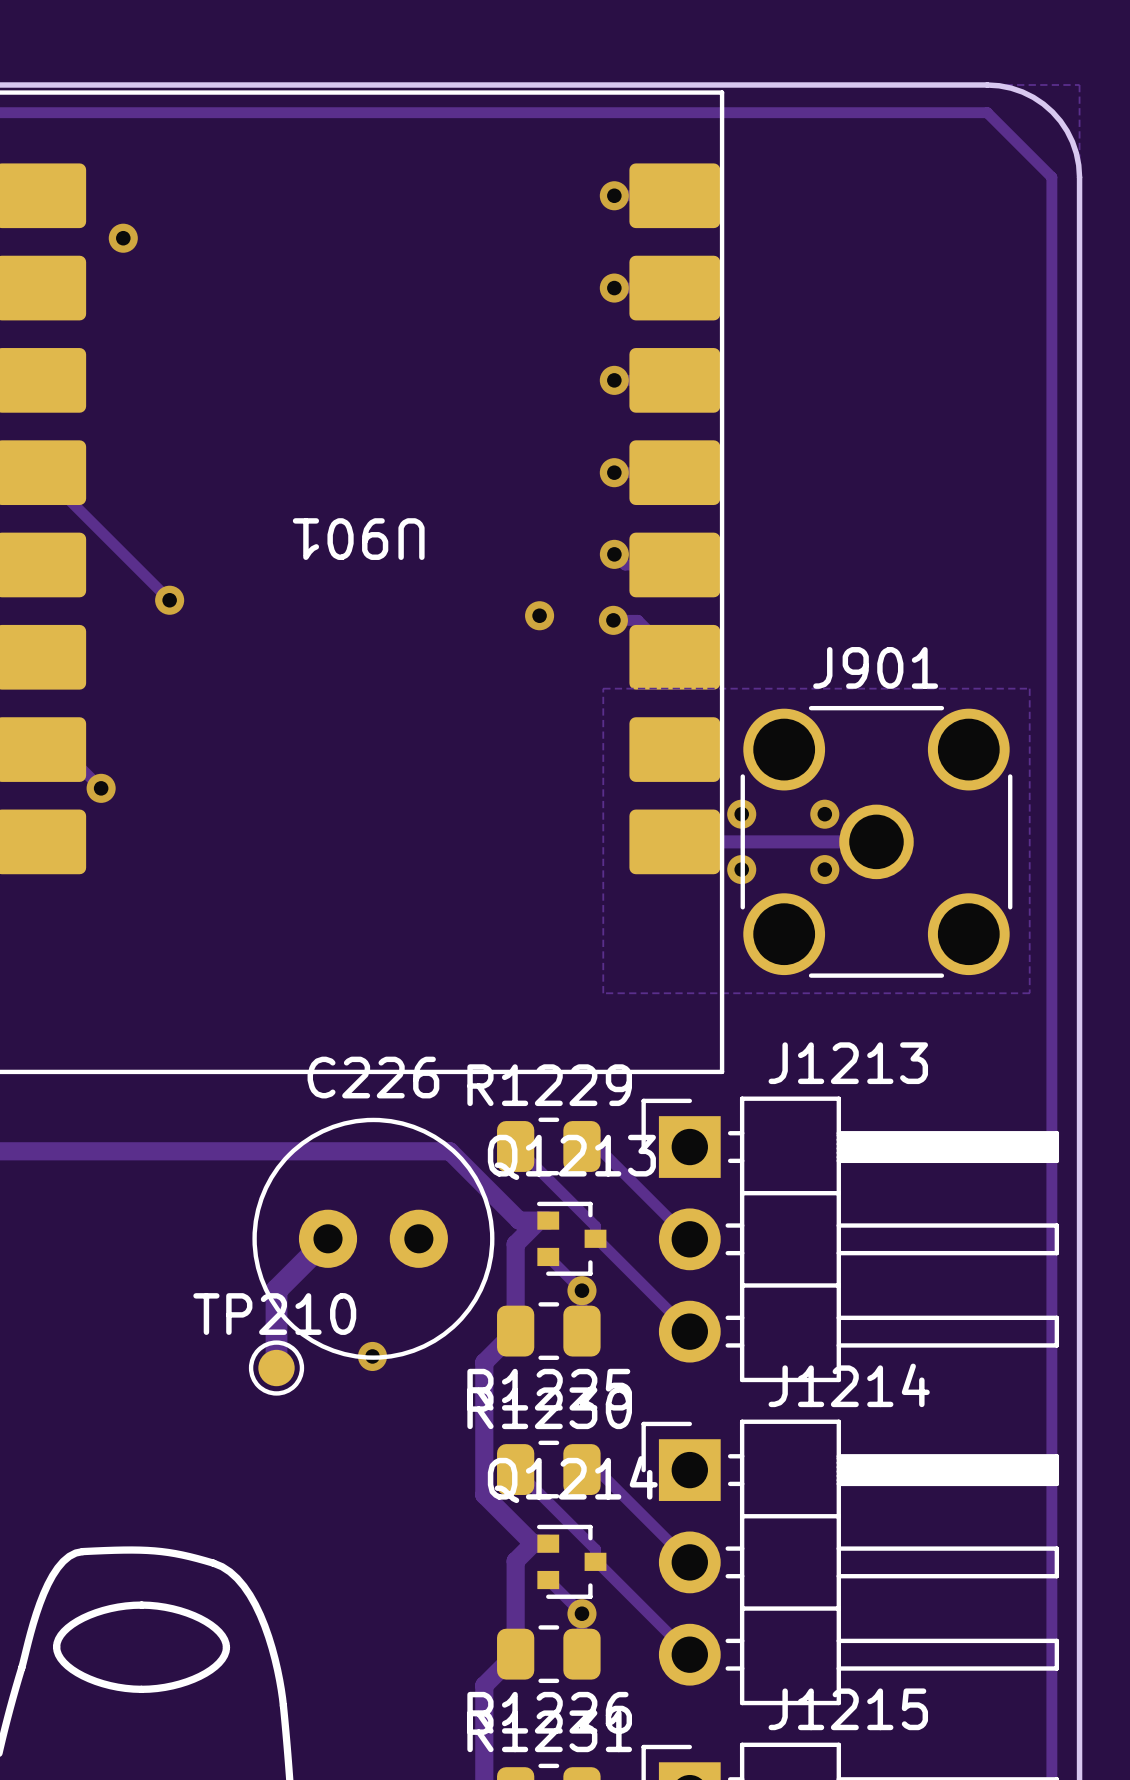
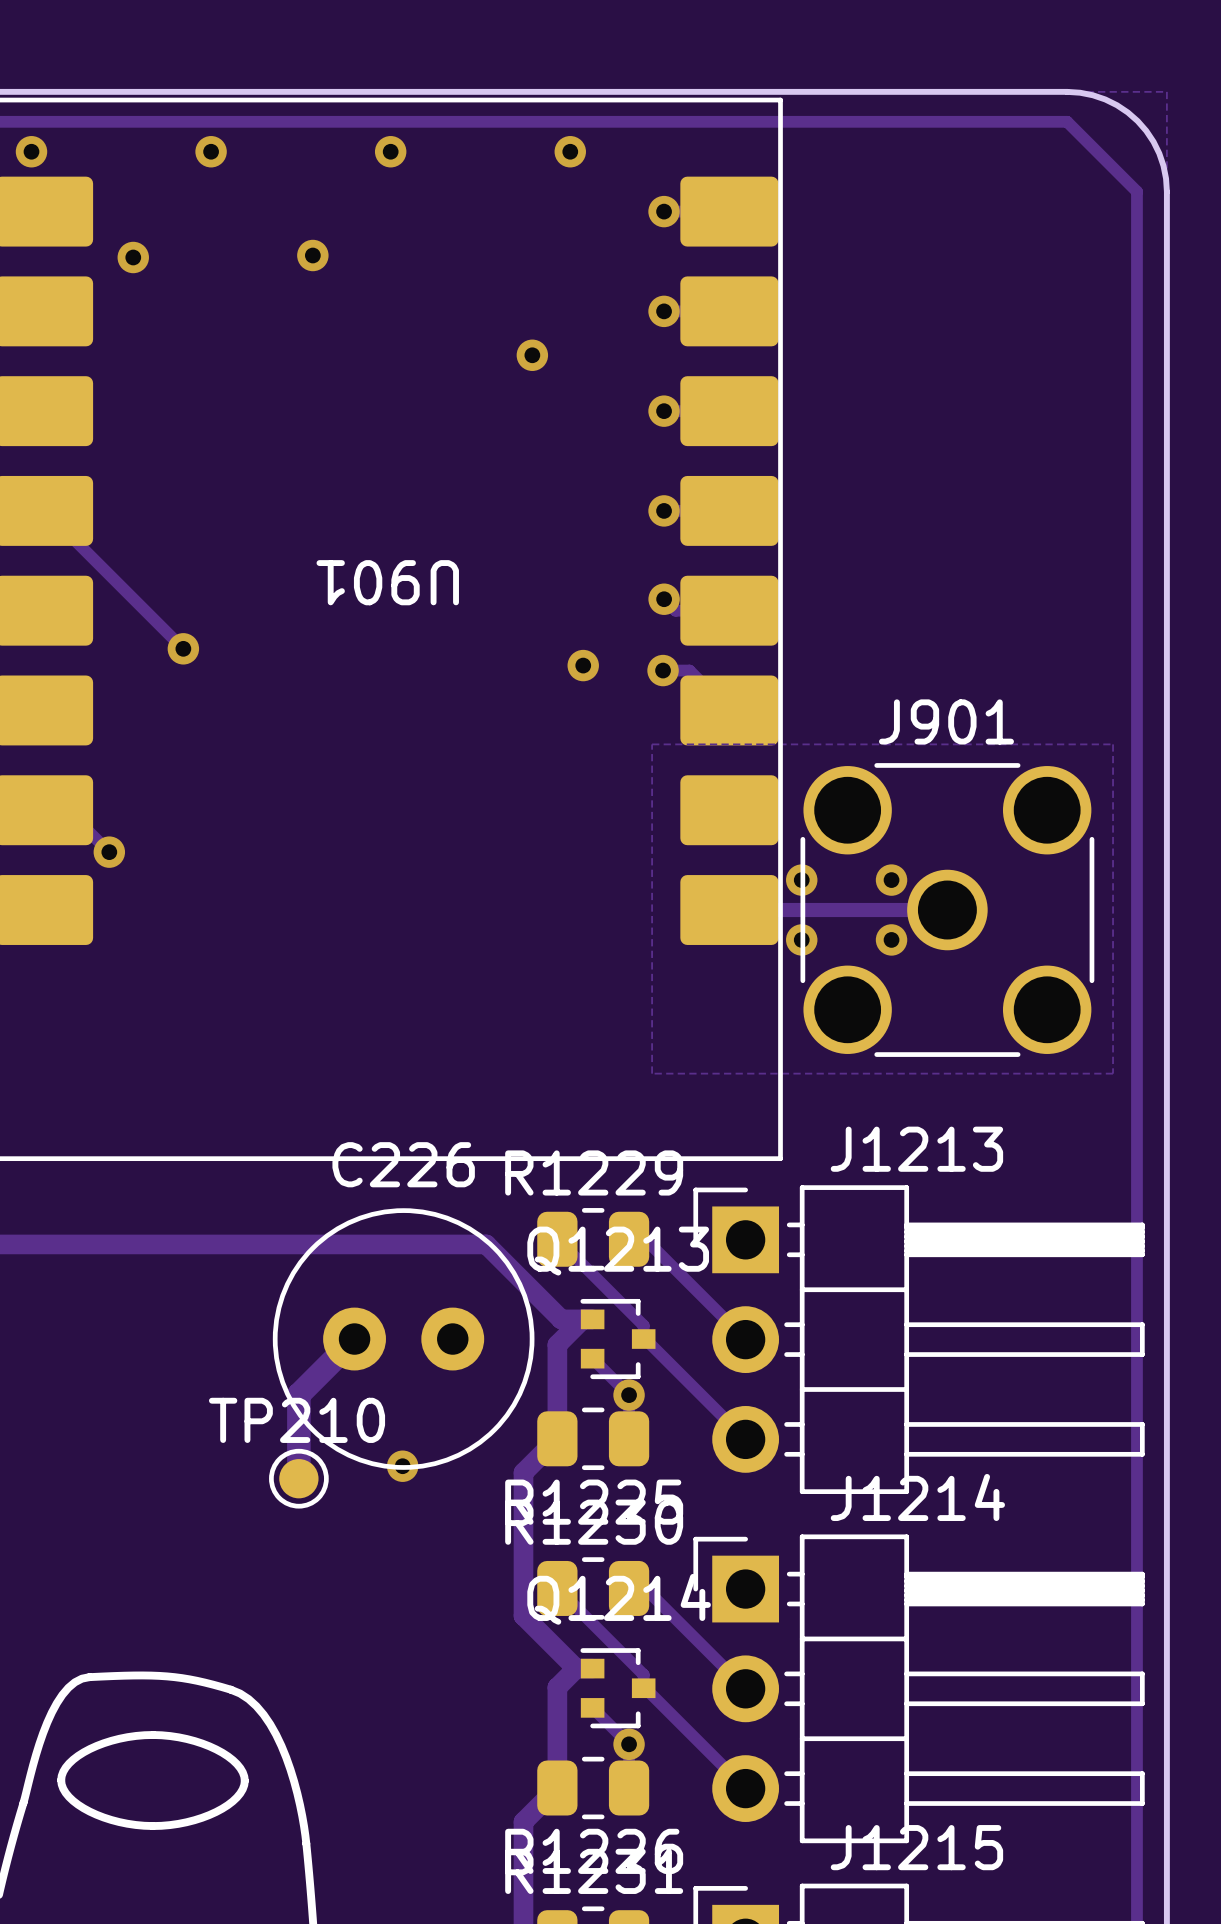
via: none -> (31, 151)
via: none -> (211, 151)
via: none -> (390, 151)
via: none -> (570, 151)
via: none -> (312, 255)
via: none -> (532, 355)

